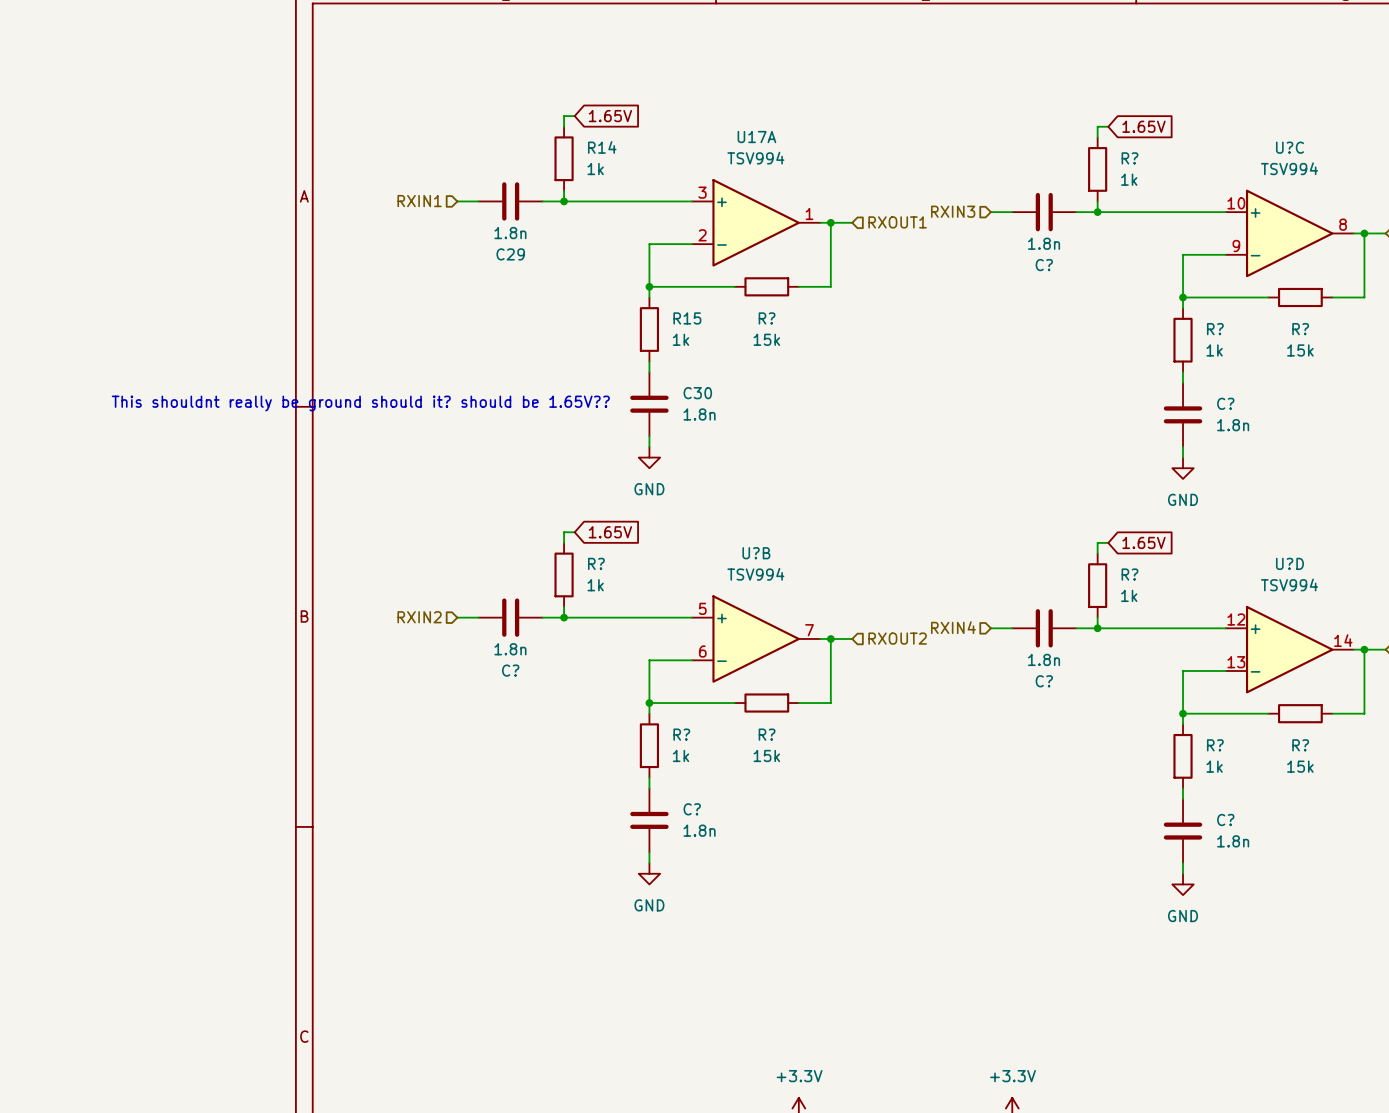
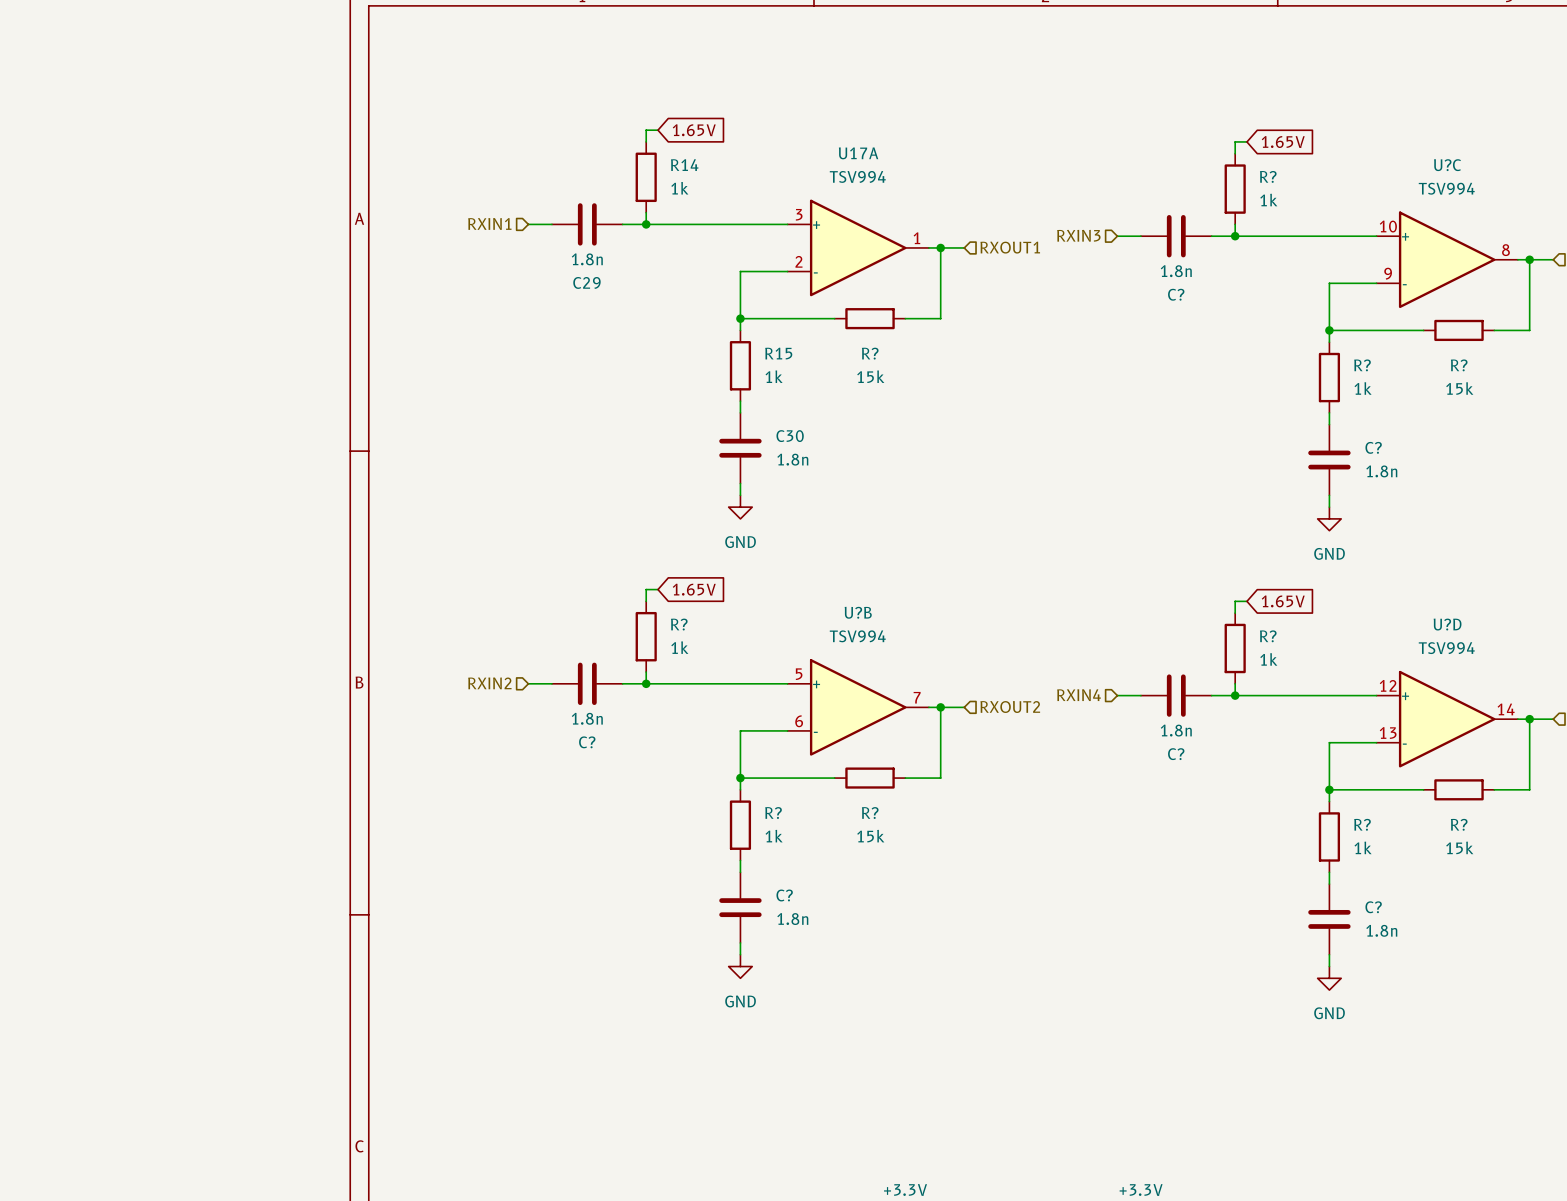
text: This shouldnt really be ground should it? should be 1.65V?? (360, 403) -> none

